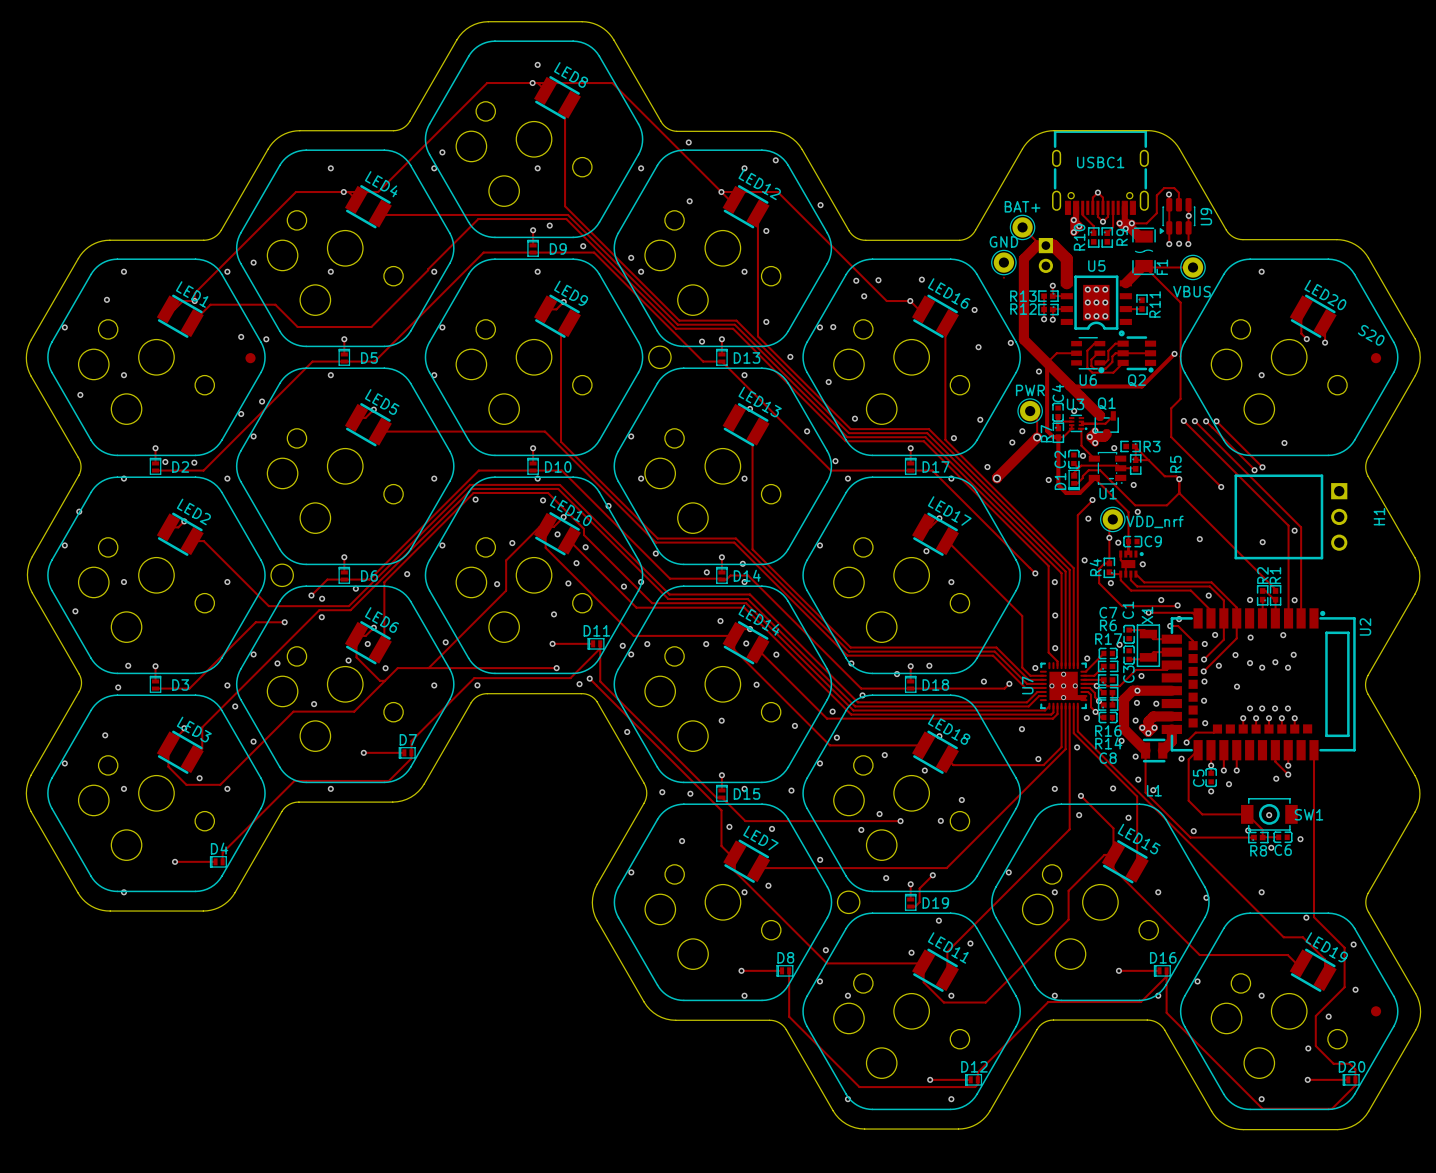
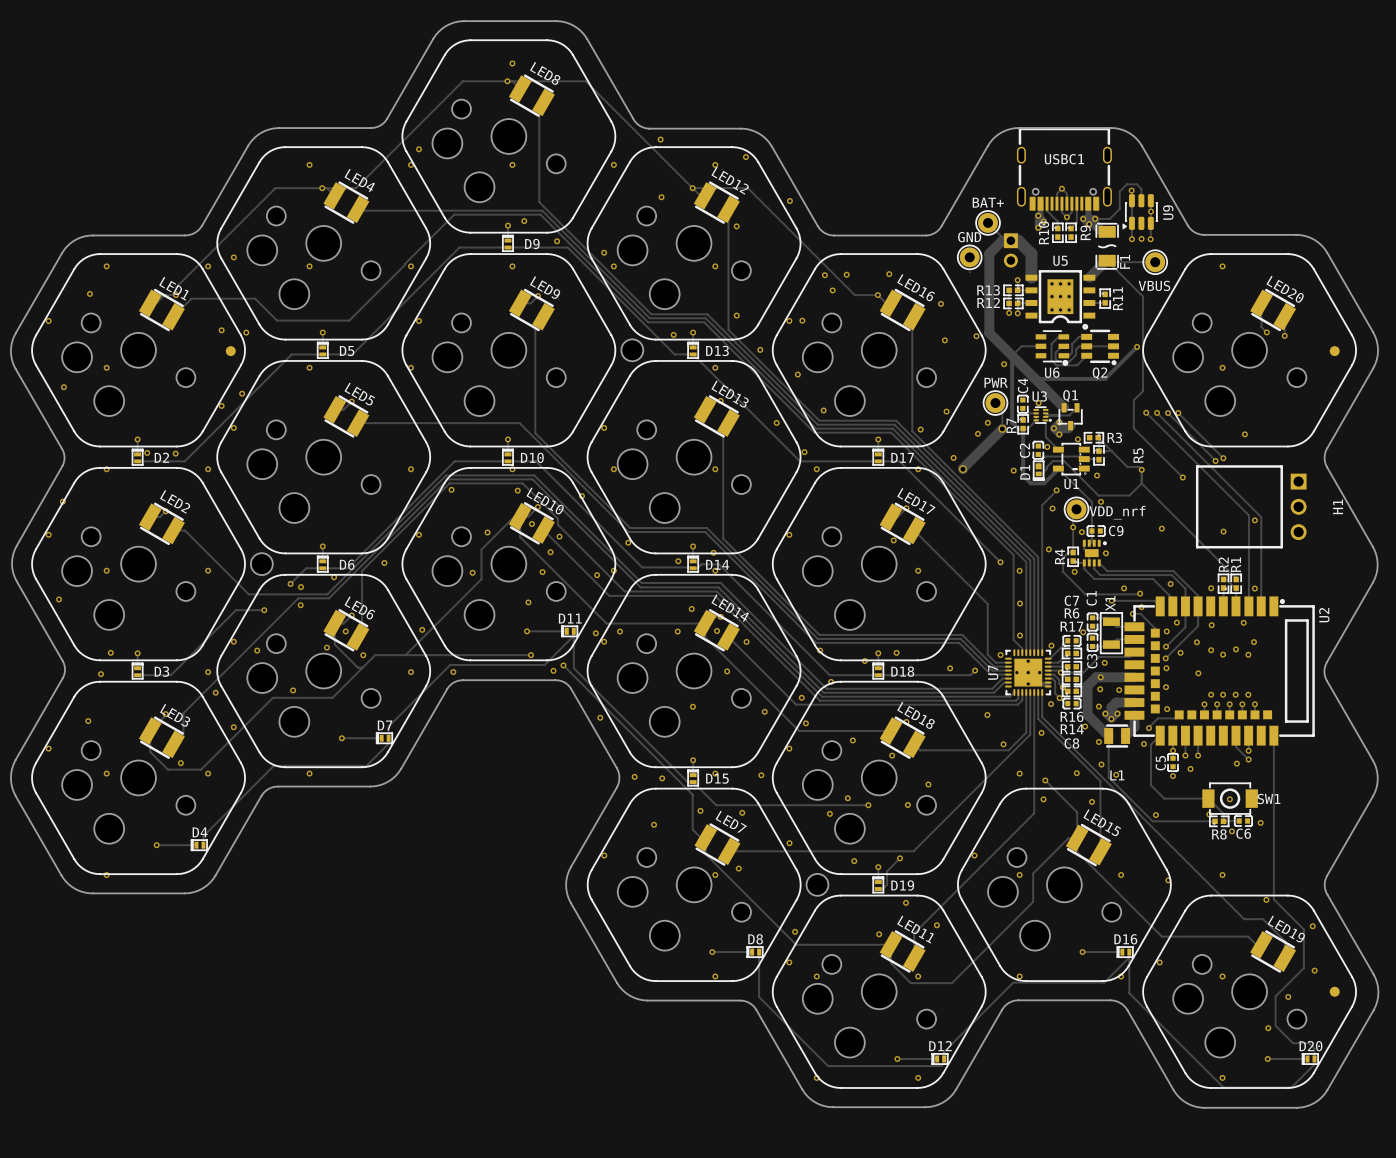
S20 name: S20 (1371, 335) -> none

